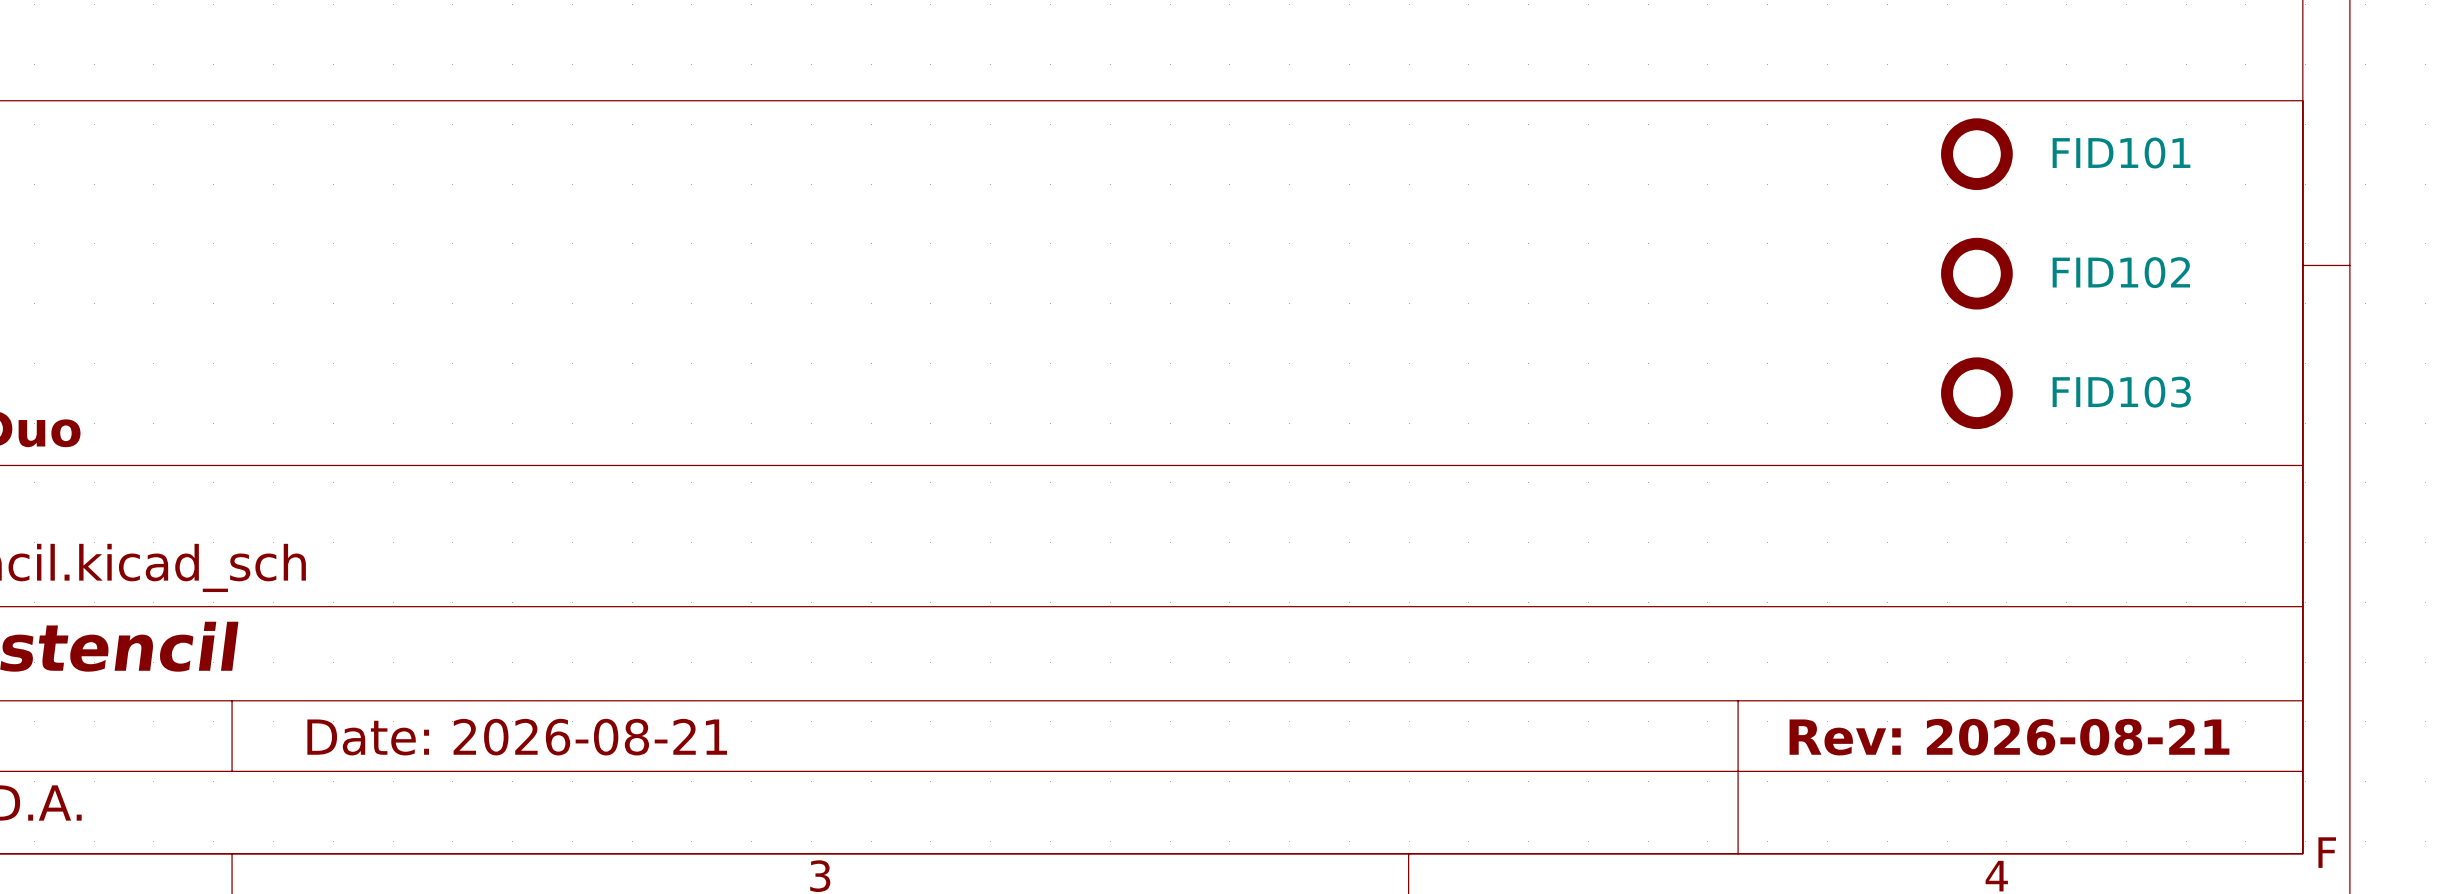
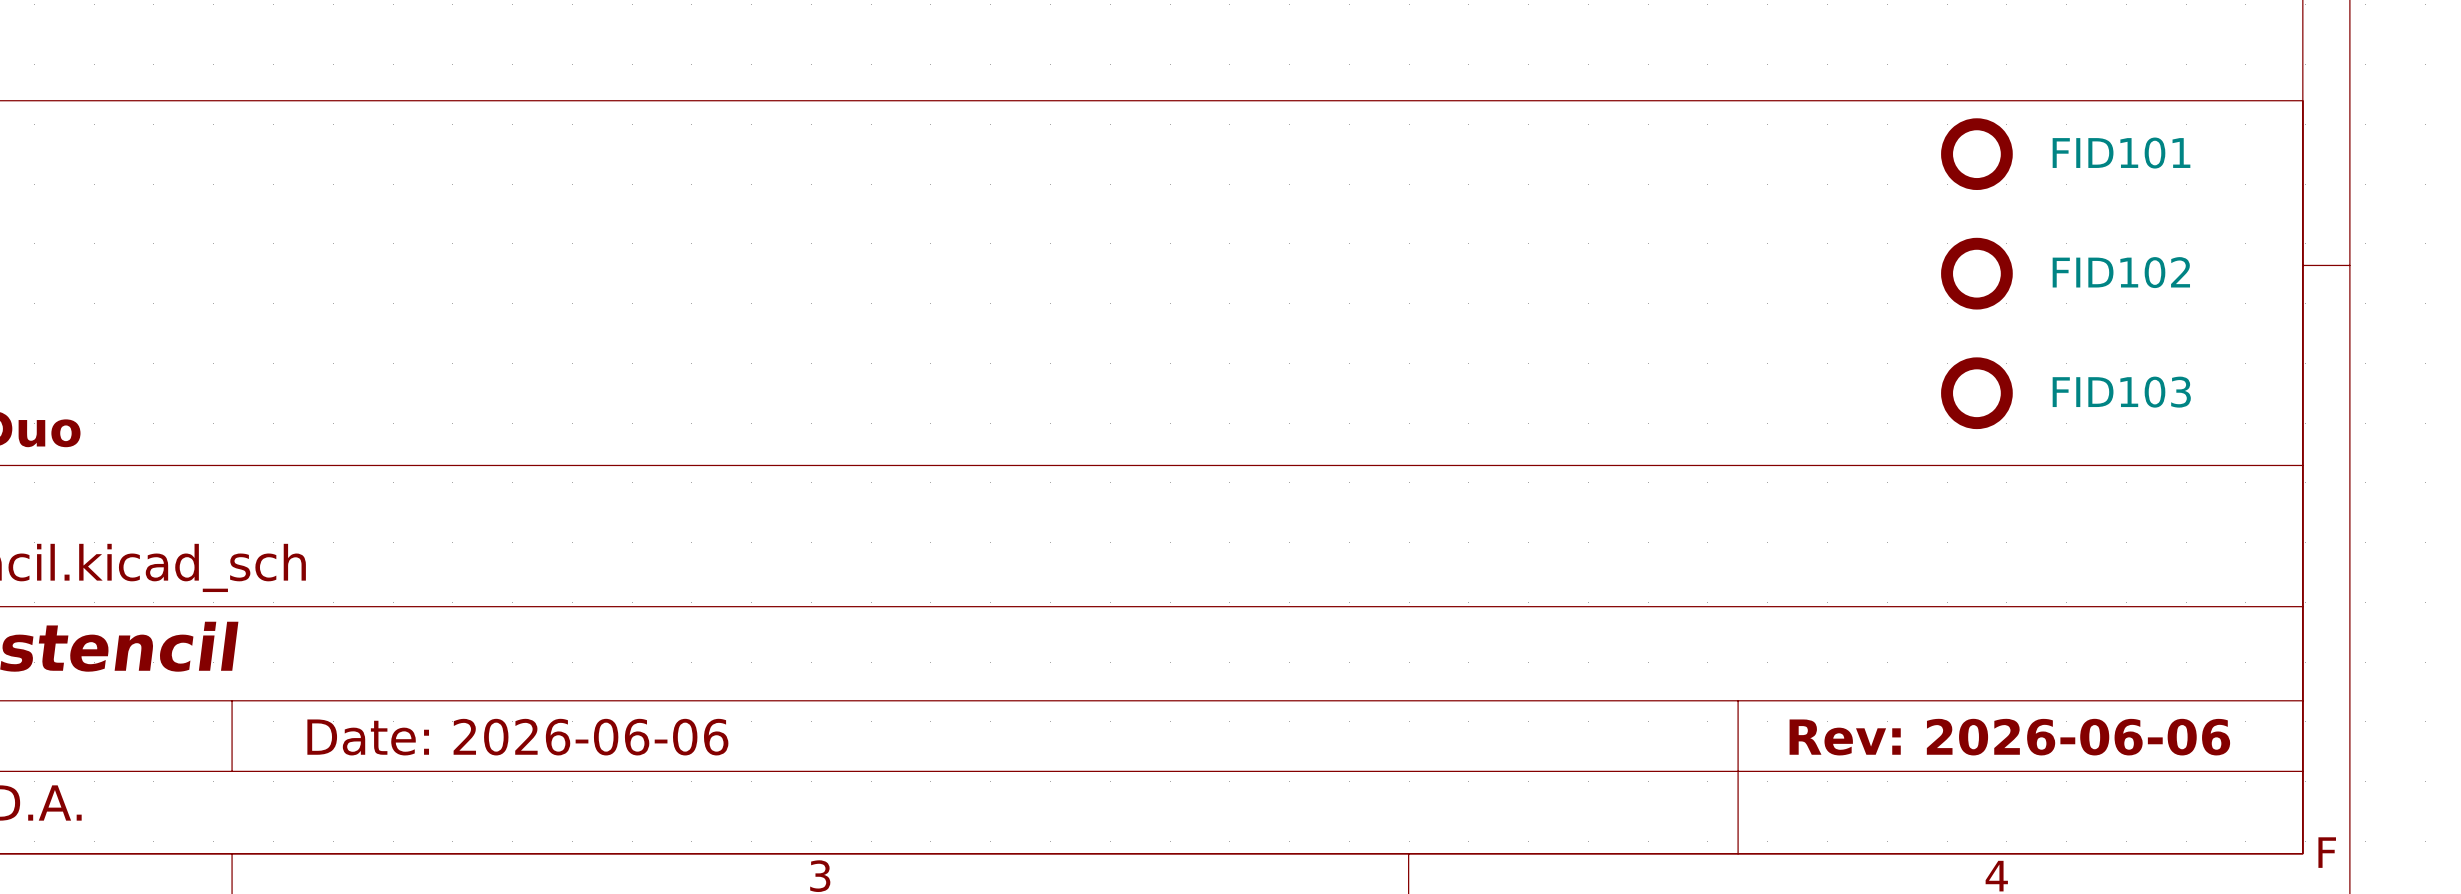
title block: Date: 2026-08-21 (517, 737) -> Date: 2026-06-06 (517, 737)
title block: Rev: 2026-08-21 (2009, 737) -> Rev: 2026-06-06 (2009, 737)

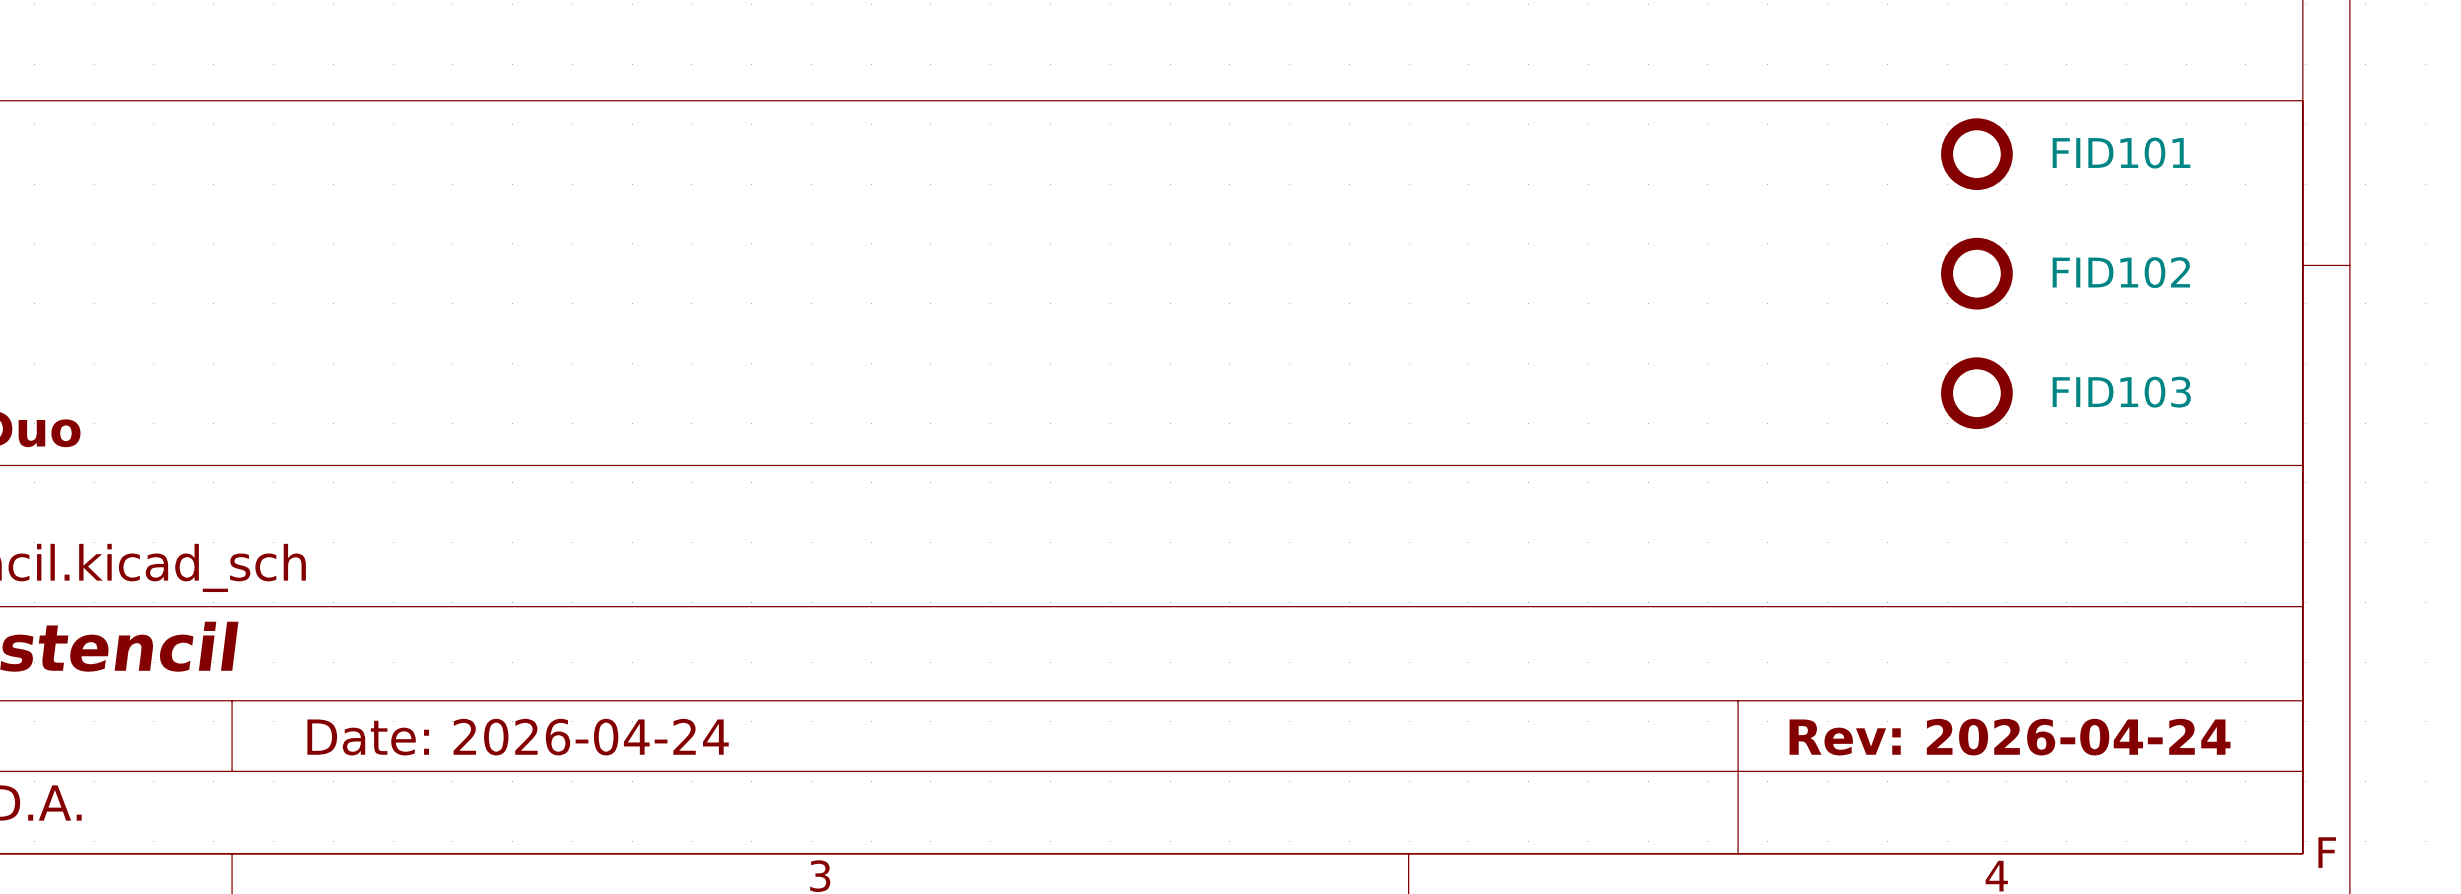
title block: Date: 2026-06-06 (517, 737) -> Date: 2026-04-24 (518, 737)
title block: Rev: 2026-06-06 (2009, 737) -> Rev: 2026-04-24 (2010, 737)

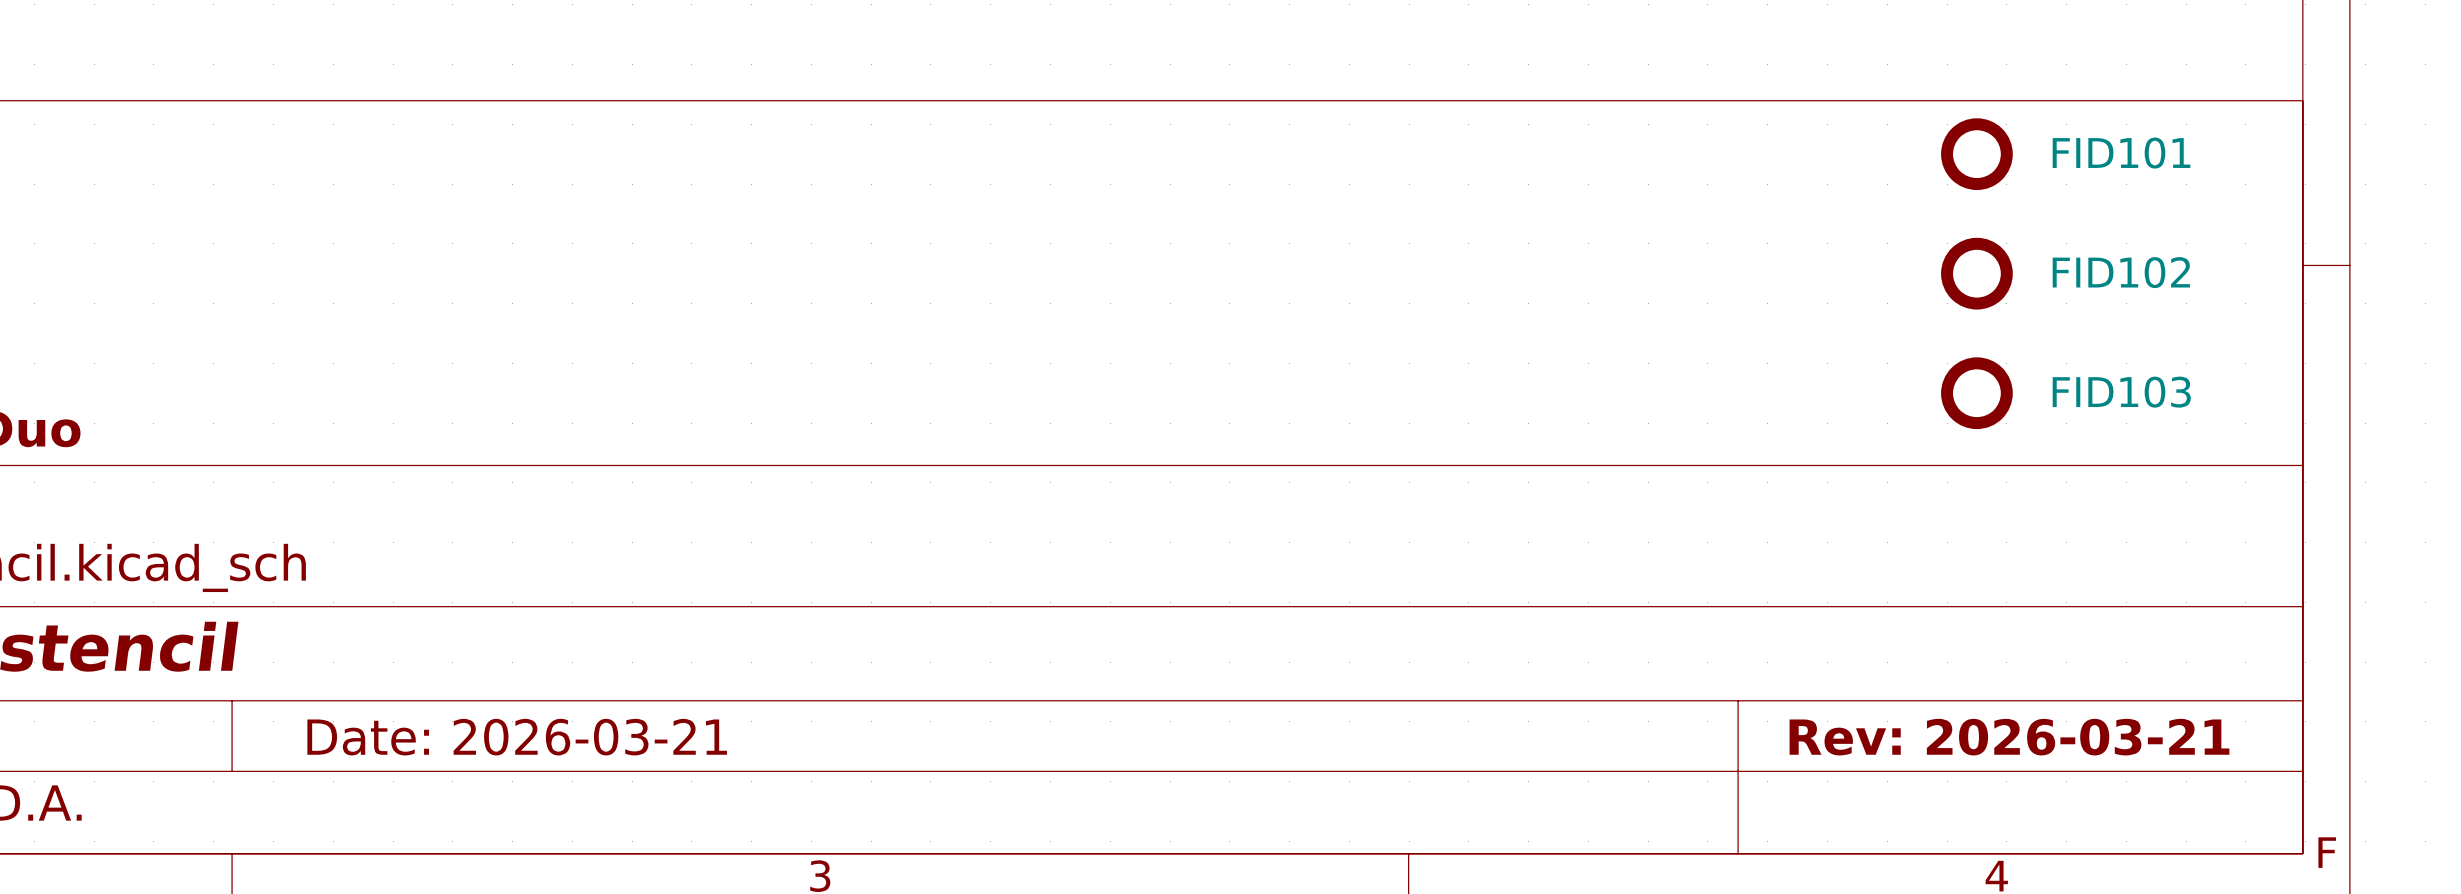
title block: Date: 2026-04-24 (518, 737) -> Date: 2026-03-21 (517, 737)
title block: Rev: 2026-04-24 (2010, 737) -> Rev: 2026-03-21 (2009, 737)

